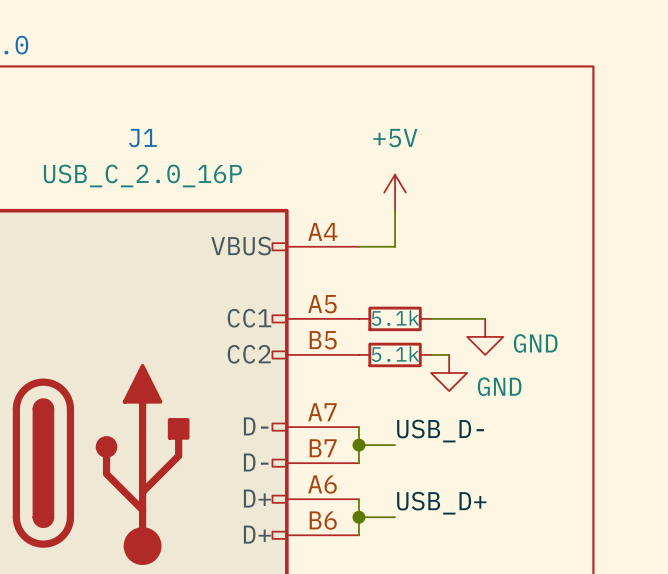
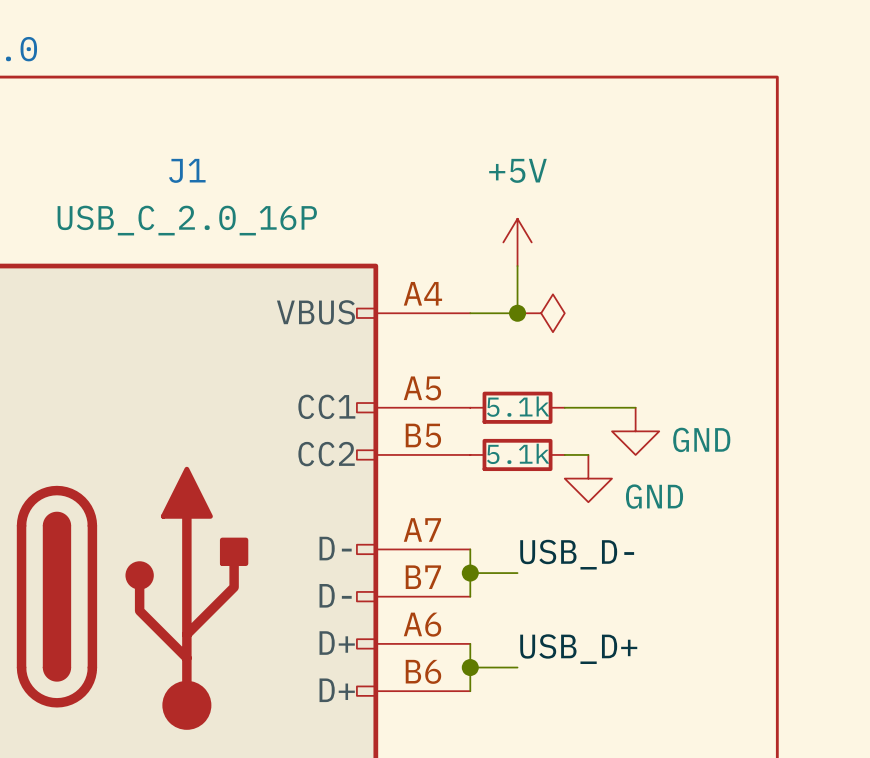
junction: none -> (517, 313)
power symbol: none -> (541, 313)

